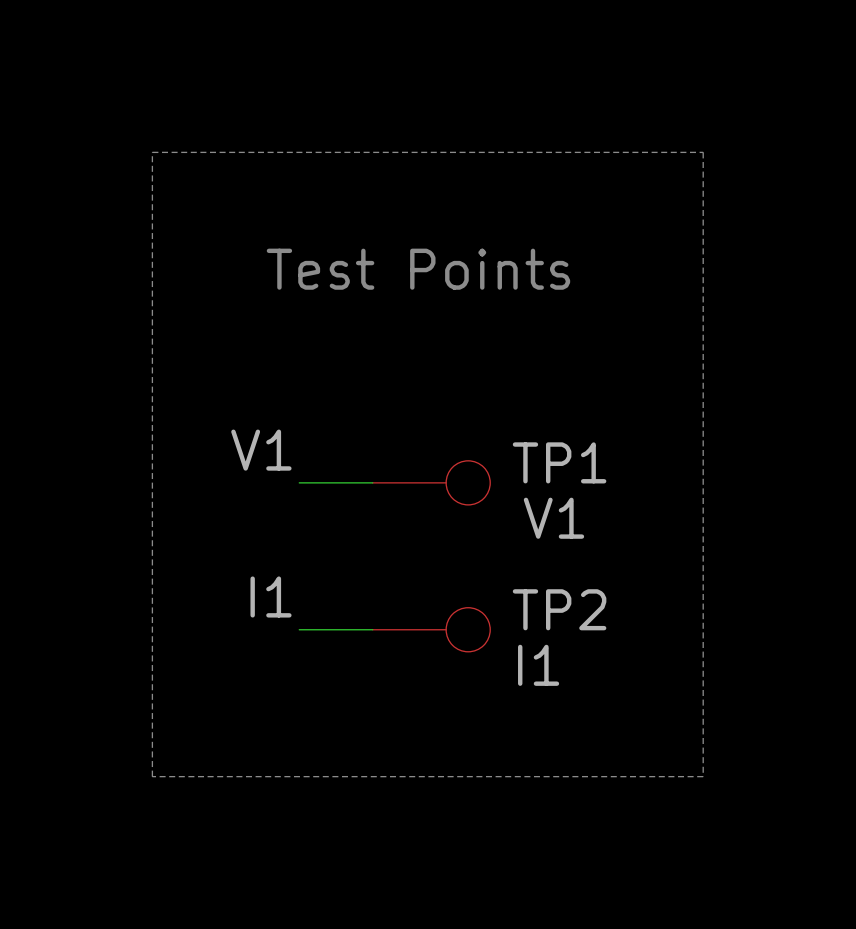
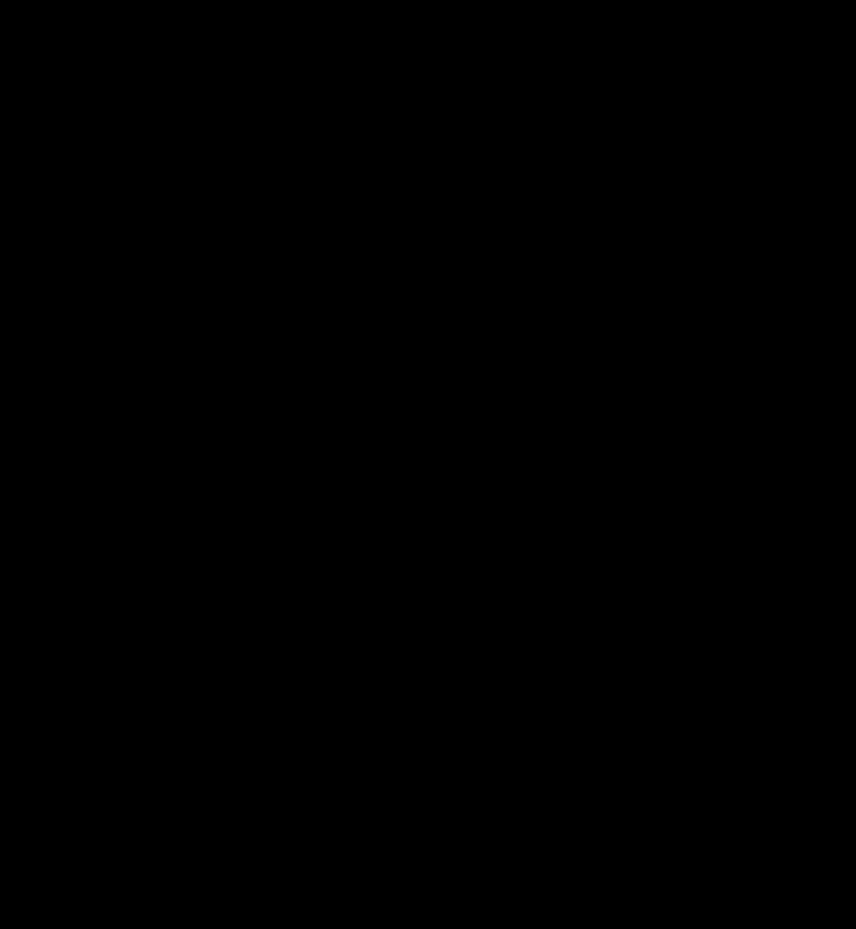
line: (152, 152) (703, 152) (703, 776) (152, 776) (152, 152) -> none
text: Test Points (418, 269) -> none
label: V1 (261, 450) -> none
wire: (299, 482) (372, 482) -> none
TP1: V1 (431, 482) -> none
label: I1 (271, 596) -> none
wire: (299, 629) (372, 629) -> none
TP2: I1 (431, 629) -> none

